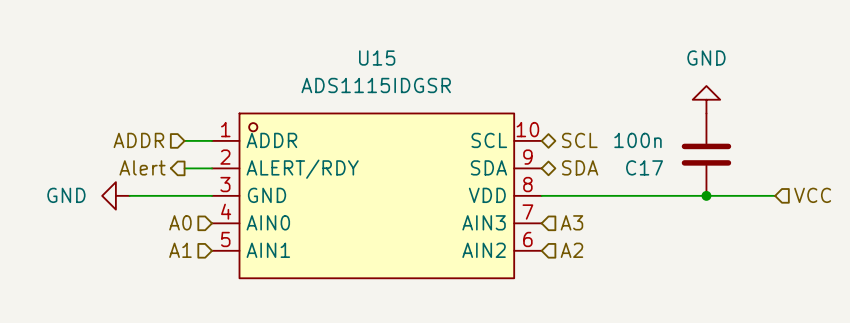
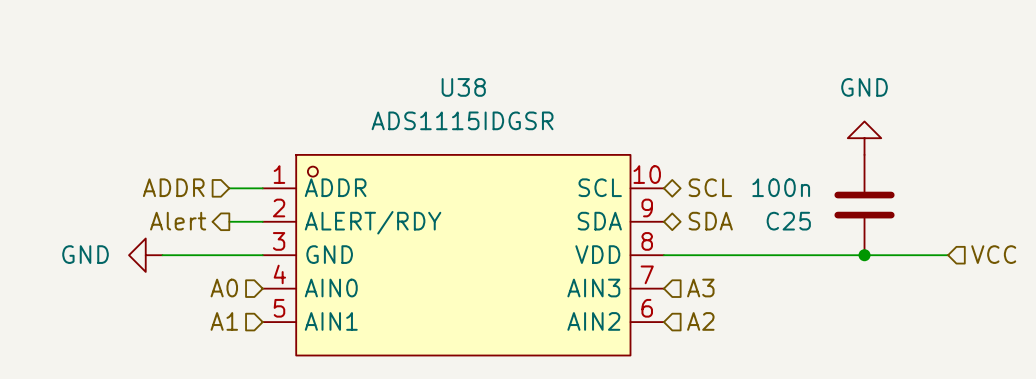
U15 name: U15 (377, 58) -> U38 (463, 87)
C17 name: C17 (644, 167) -> C25 (788, 221)

